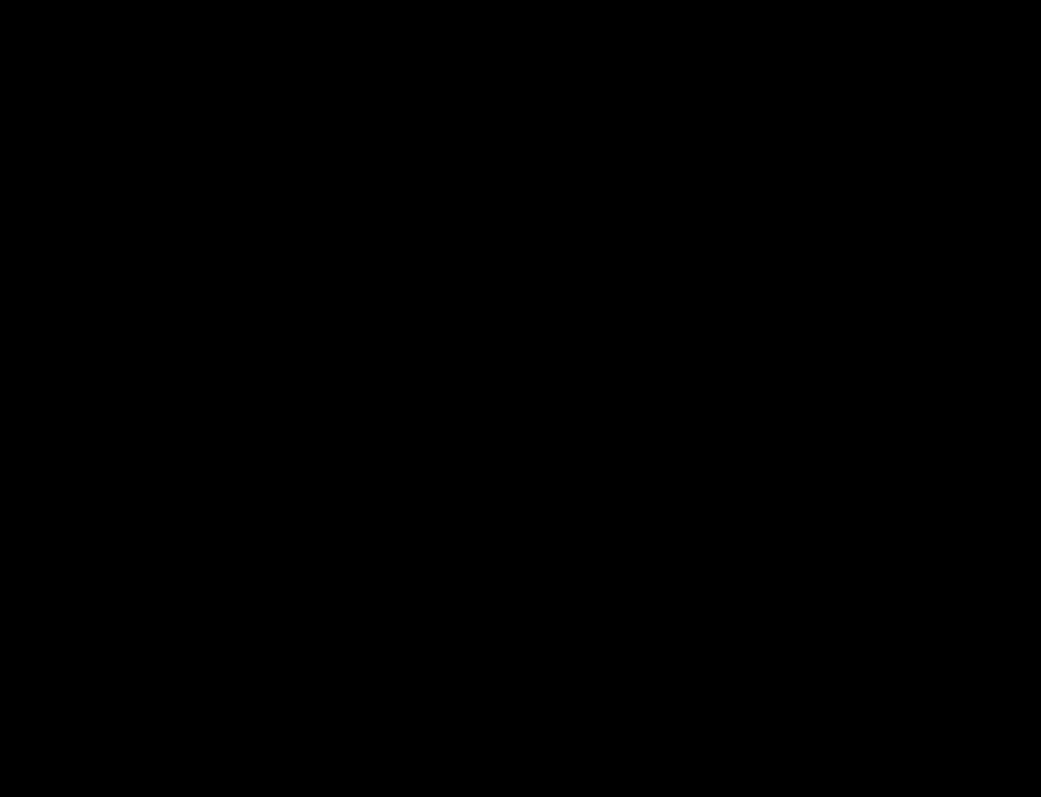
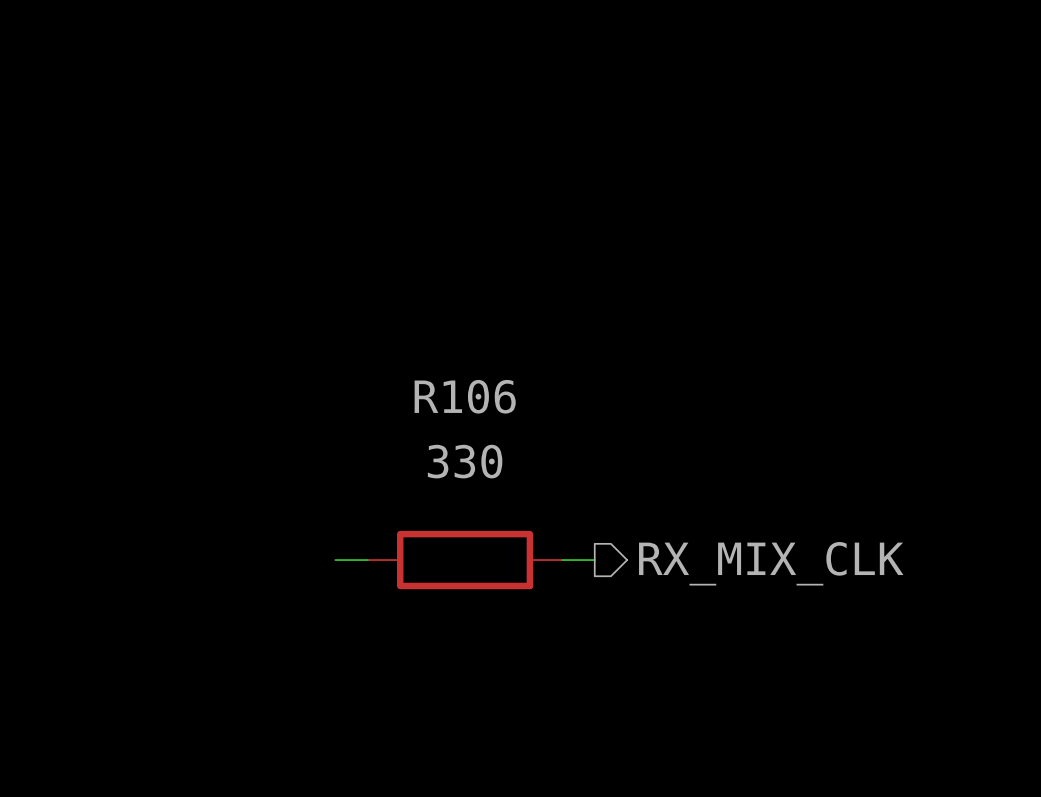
wire: none -> (335, 560) (367, 560)
R106: none -> 330 (465, 560)
wire: none -> (562, 560) (594, 560)
hierarchical label: none -> RX_MIX_CLK (771, 563)

